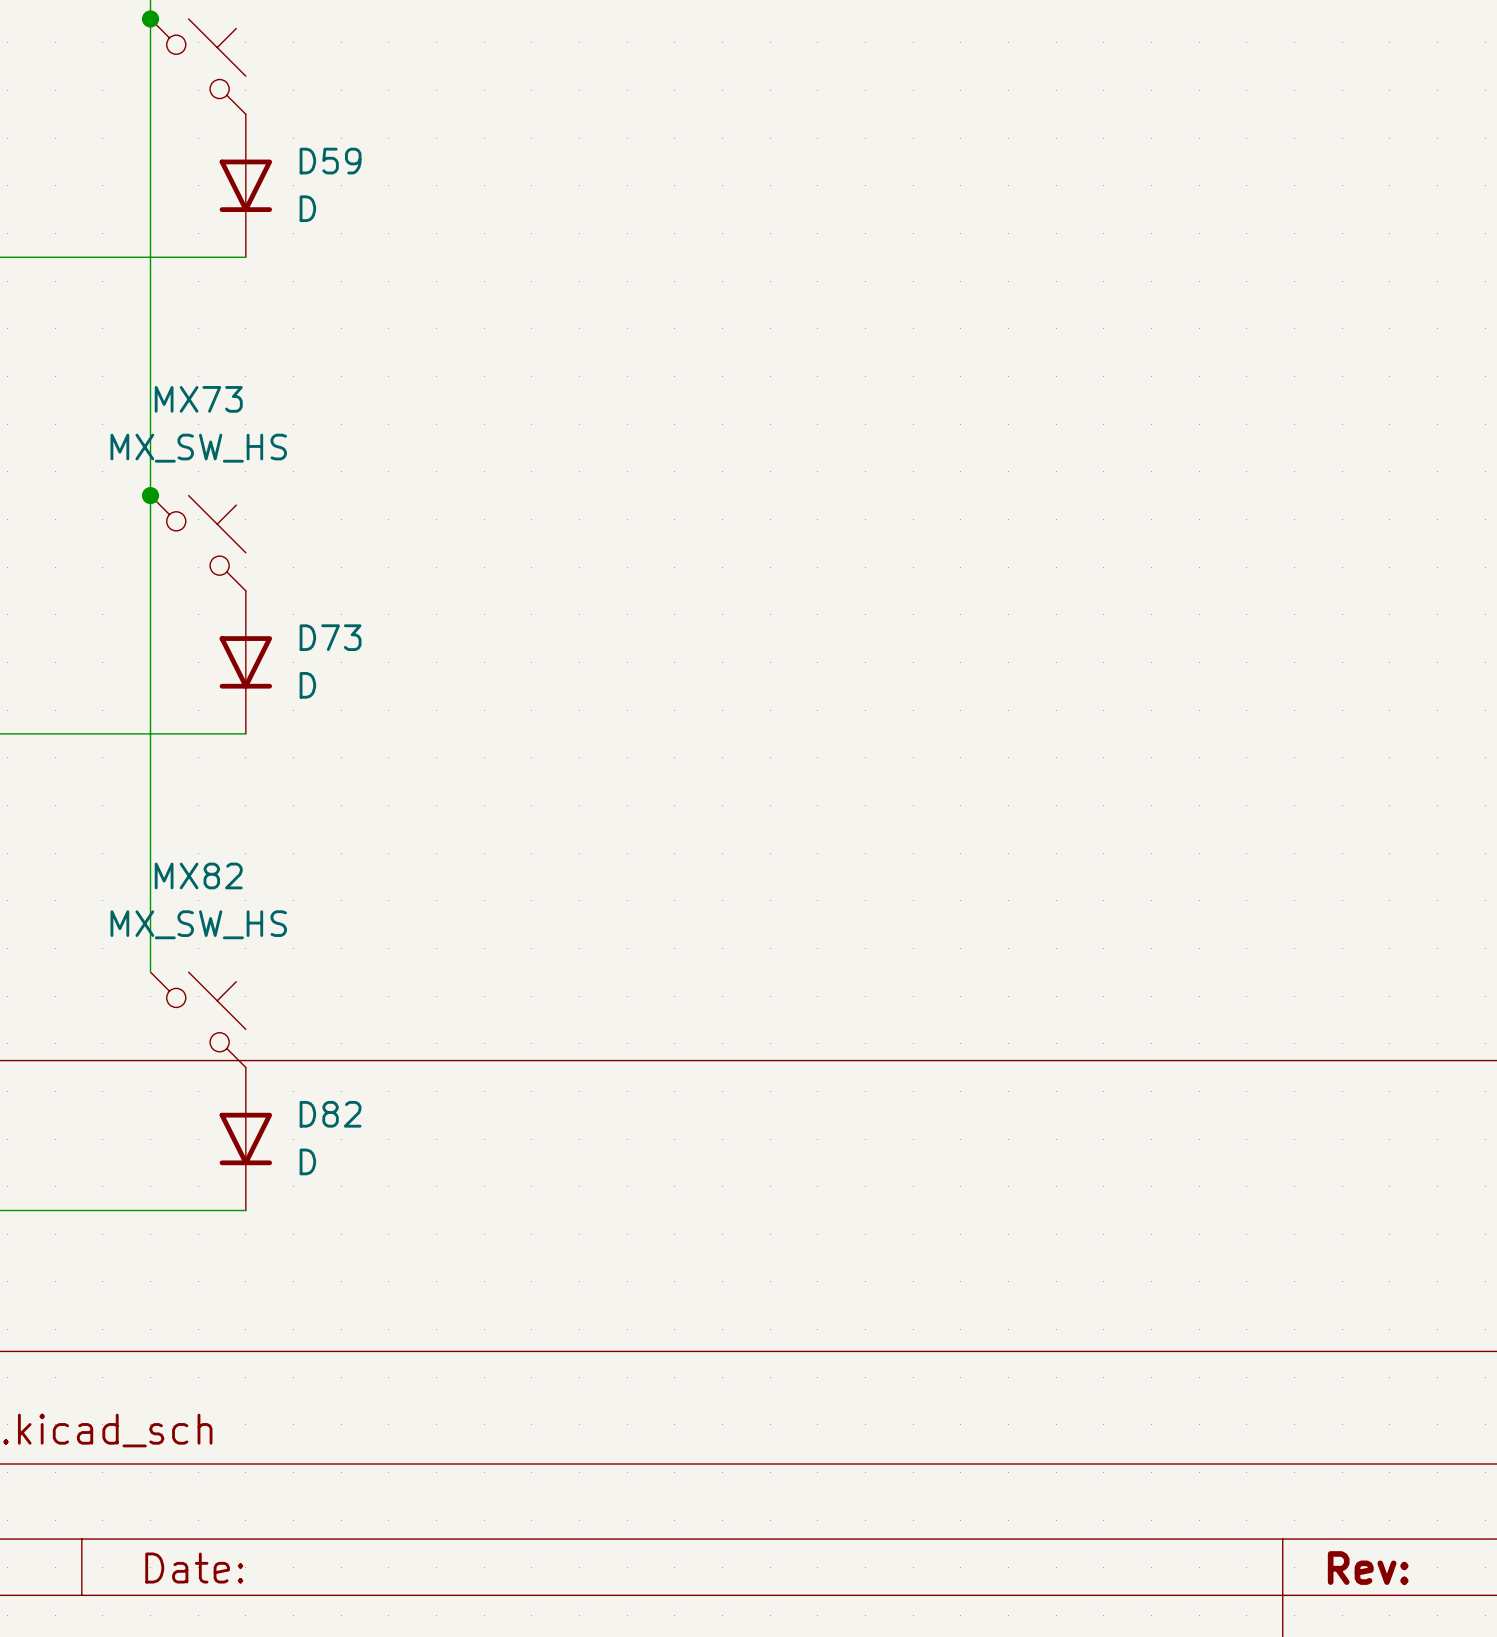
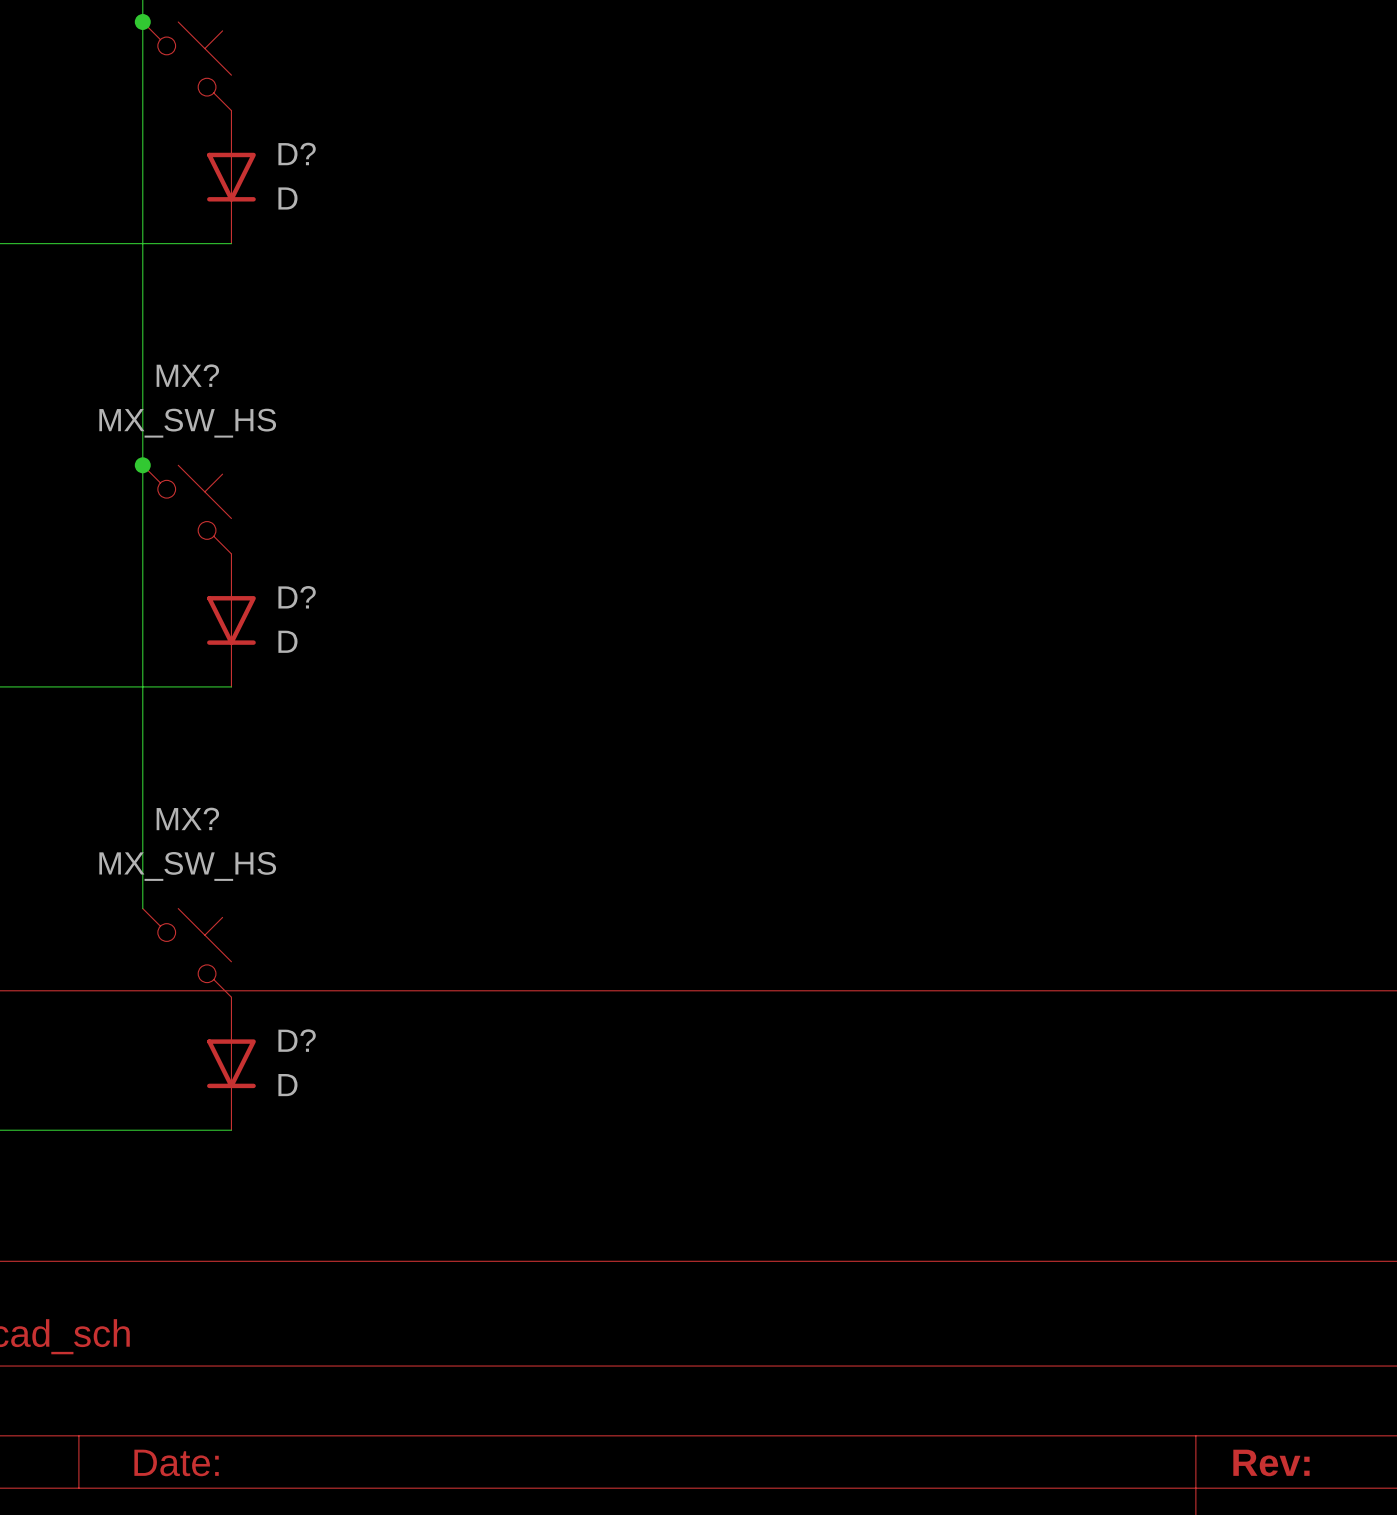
D59 name: D59 (330, 161) -> D? (297, 153)
MX73 name: MX73 (198, 399) -> MX? (187, 375)
D73 name: D73 (330, 637) -> D? (297, 597)
MX82 name: MX82 (198, 875) -> MX? (187, 818)
D82 name: D82 (330, 1114) -> D? (297, 1040)

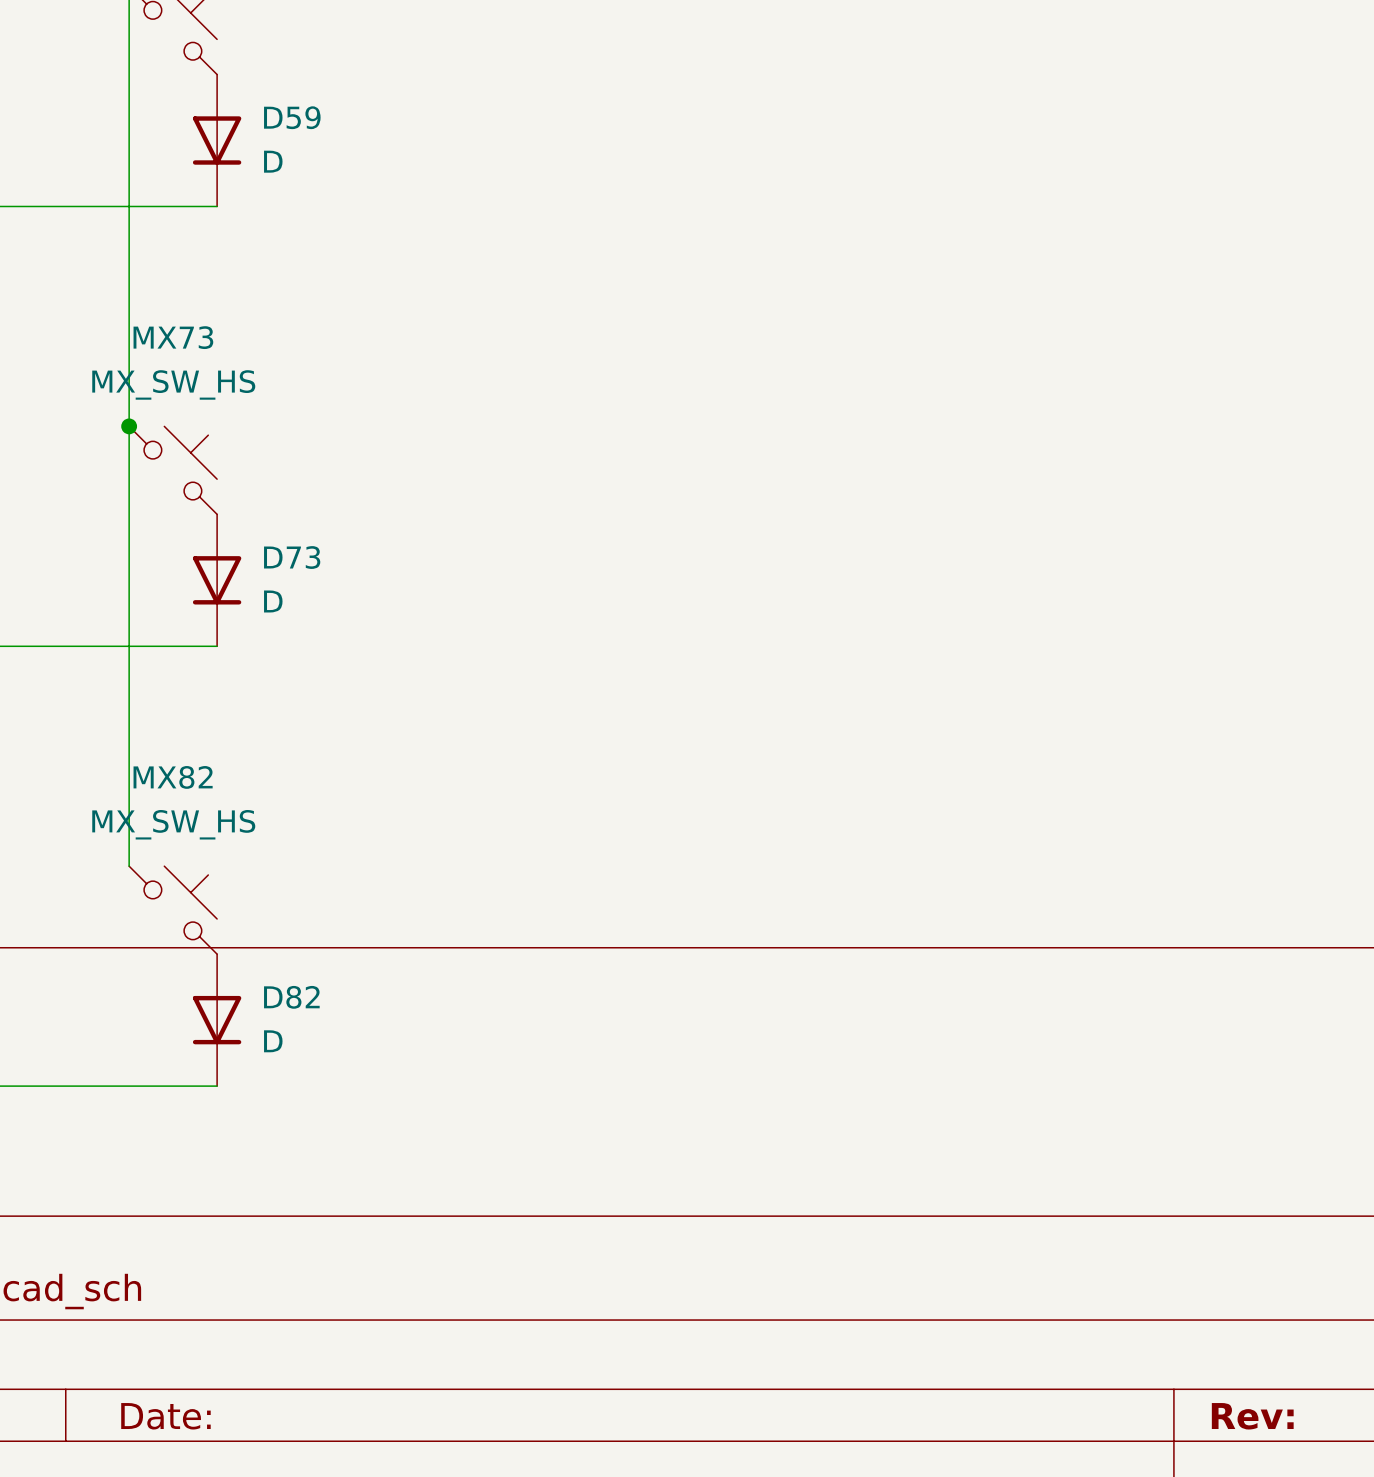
D? name: D? (297, 153) -> D59 (292, 117)
MX? name: MX? (187, 375) -> MX73 (173, 337)
D? name: D? (297, 597) -> D73 (292, 557)
MX? name: MX? (187, 818) -> MX82 (173, 777)
D? name: D? (297, 1040) -> D82 (291, 997)

